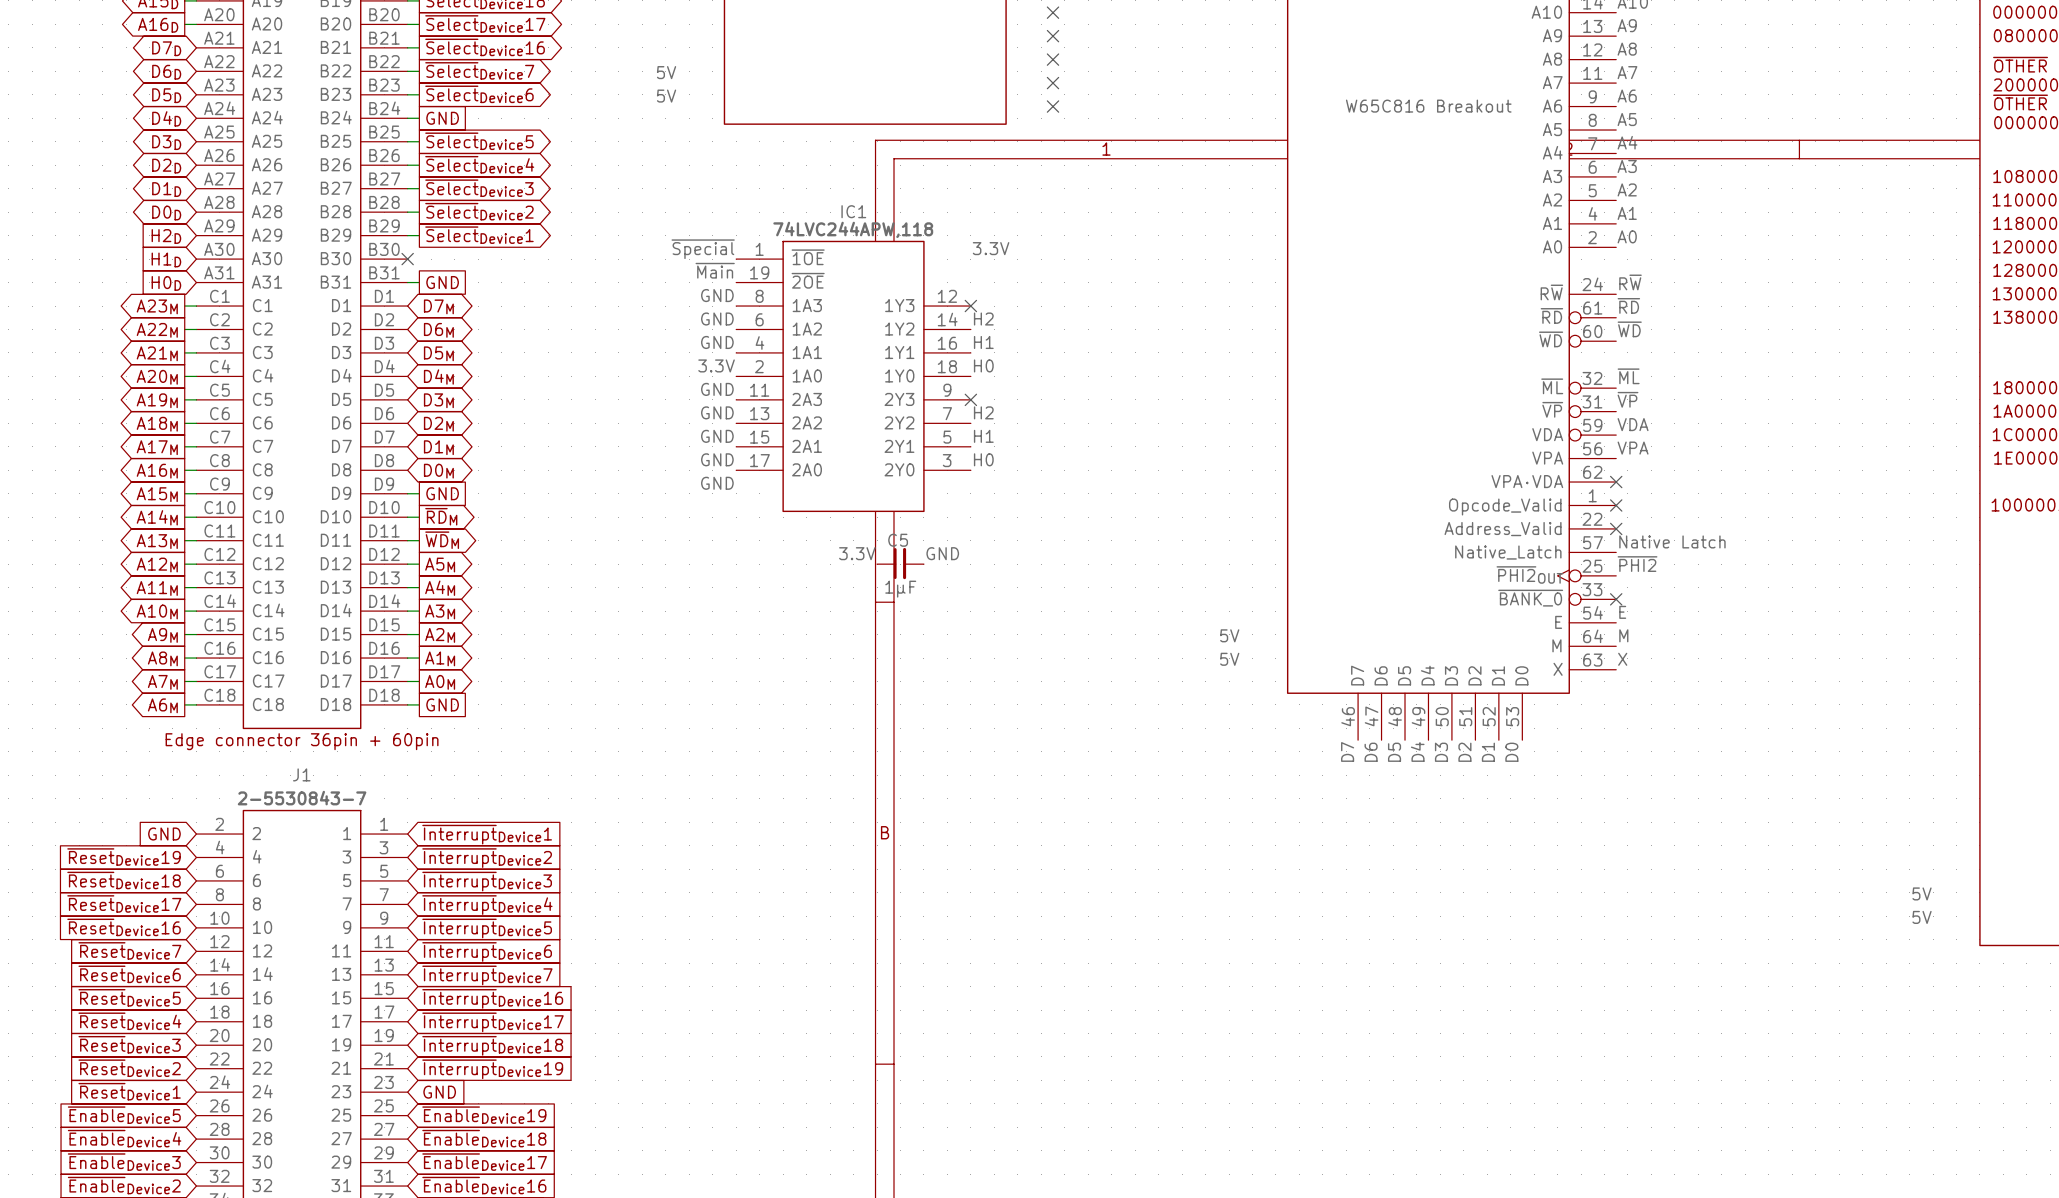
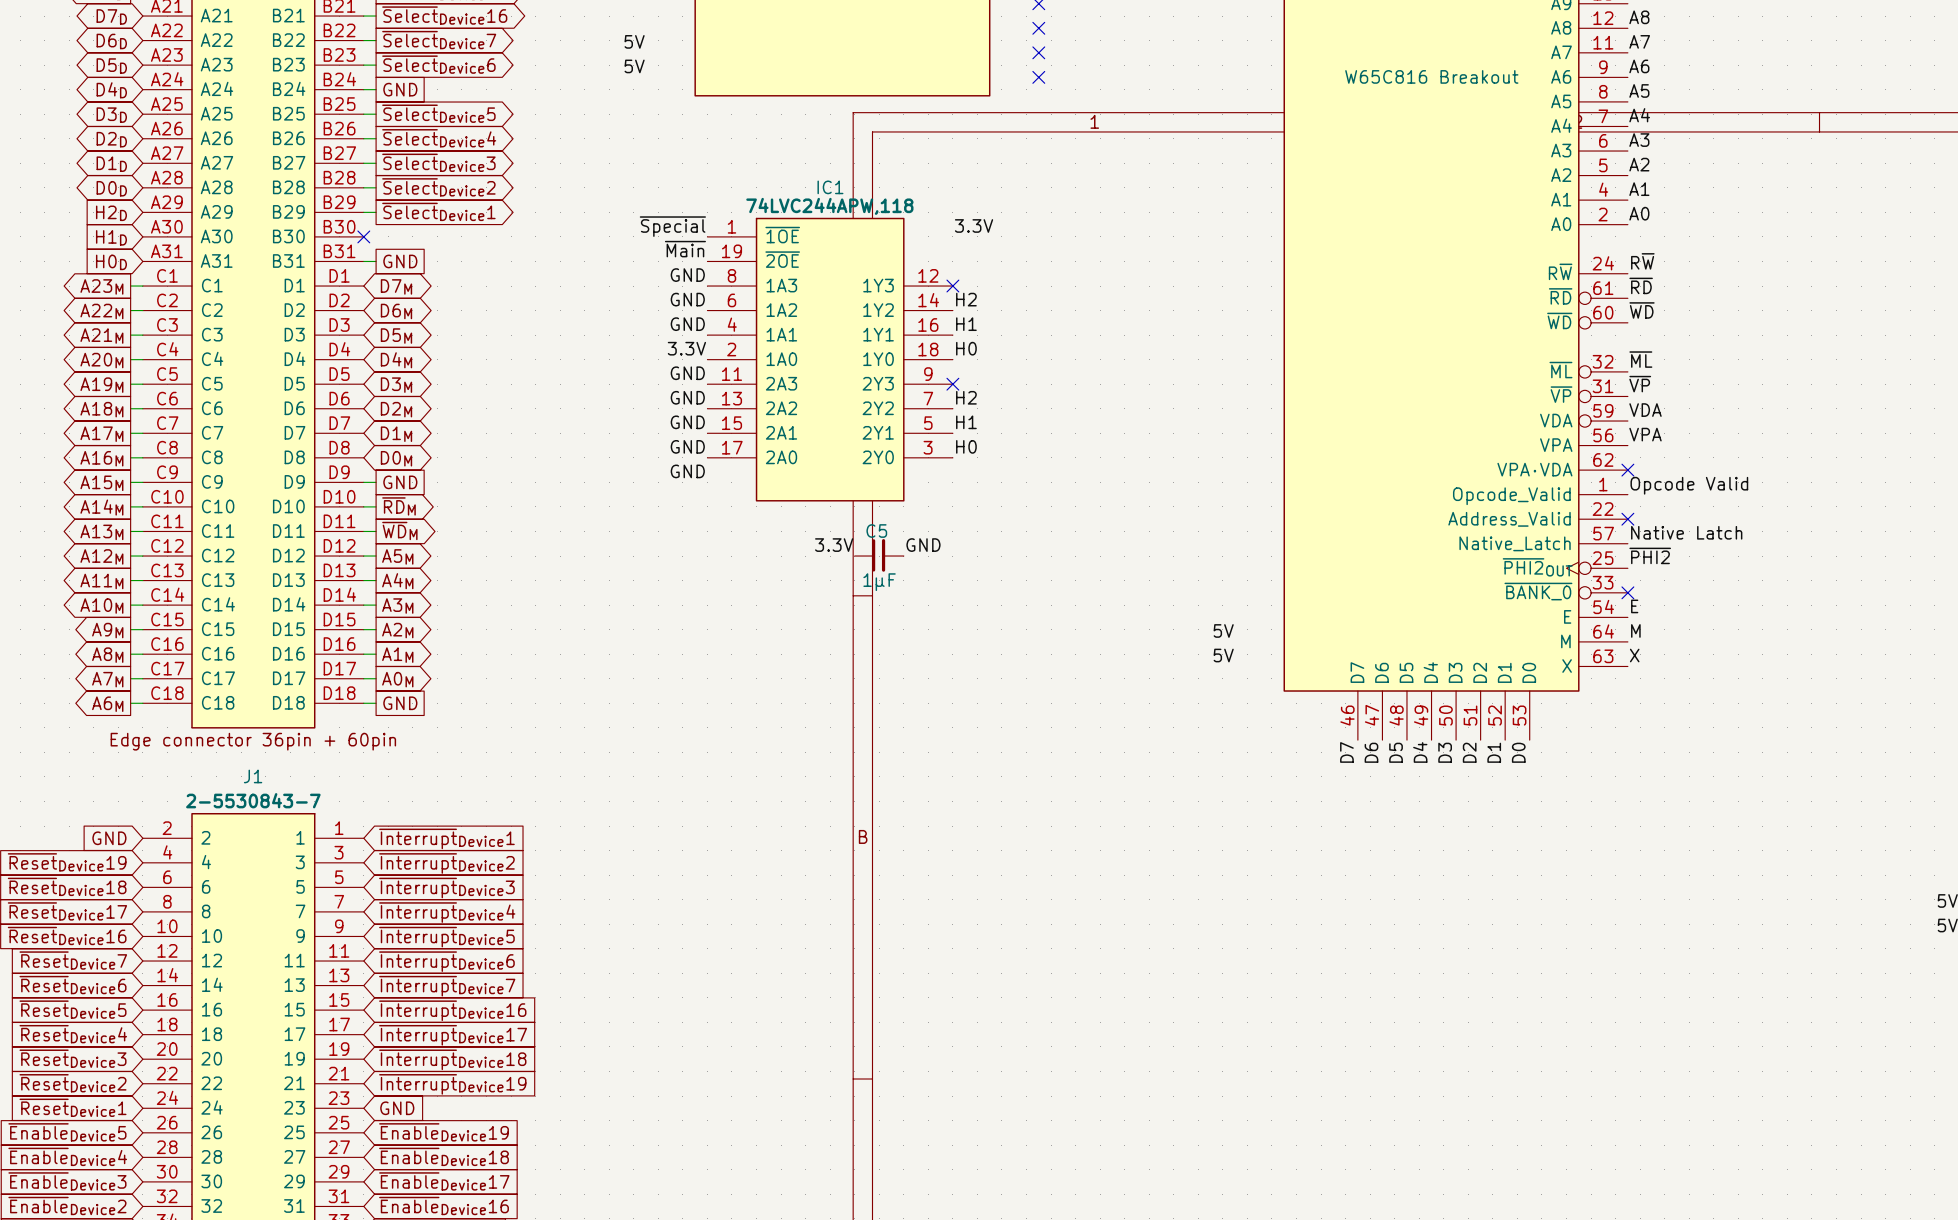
label: none -> Opcode Valid (1689, 485)
no-connect mark: (1616, 505) -> none

